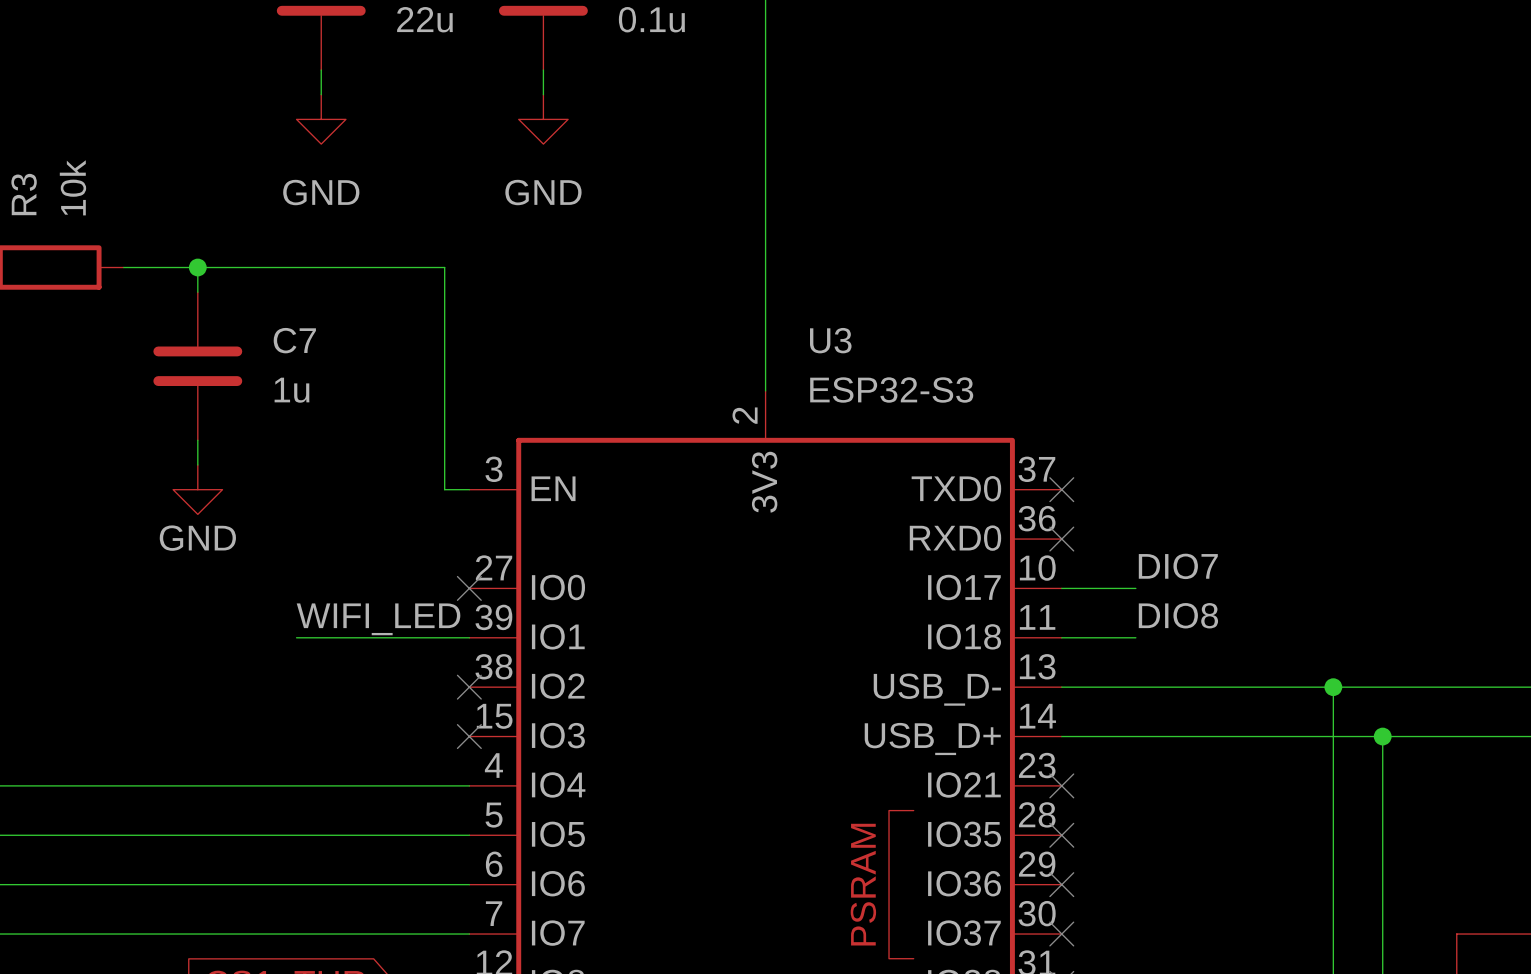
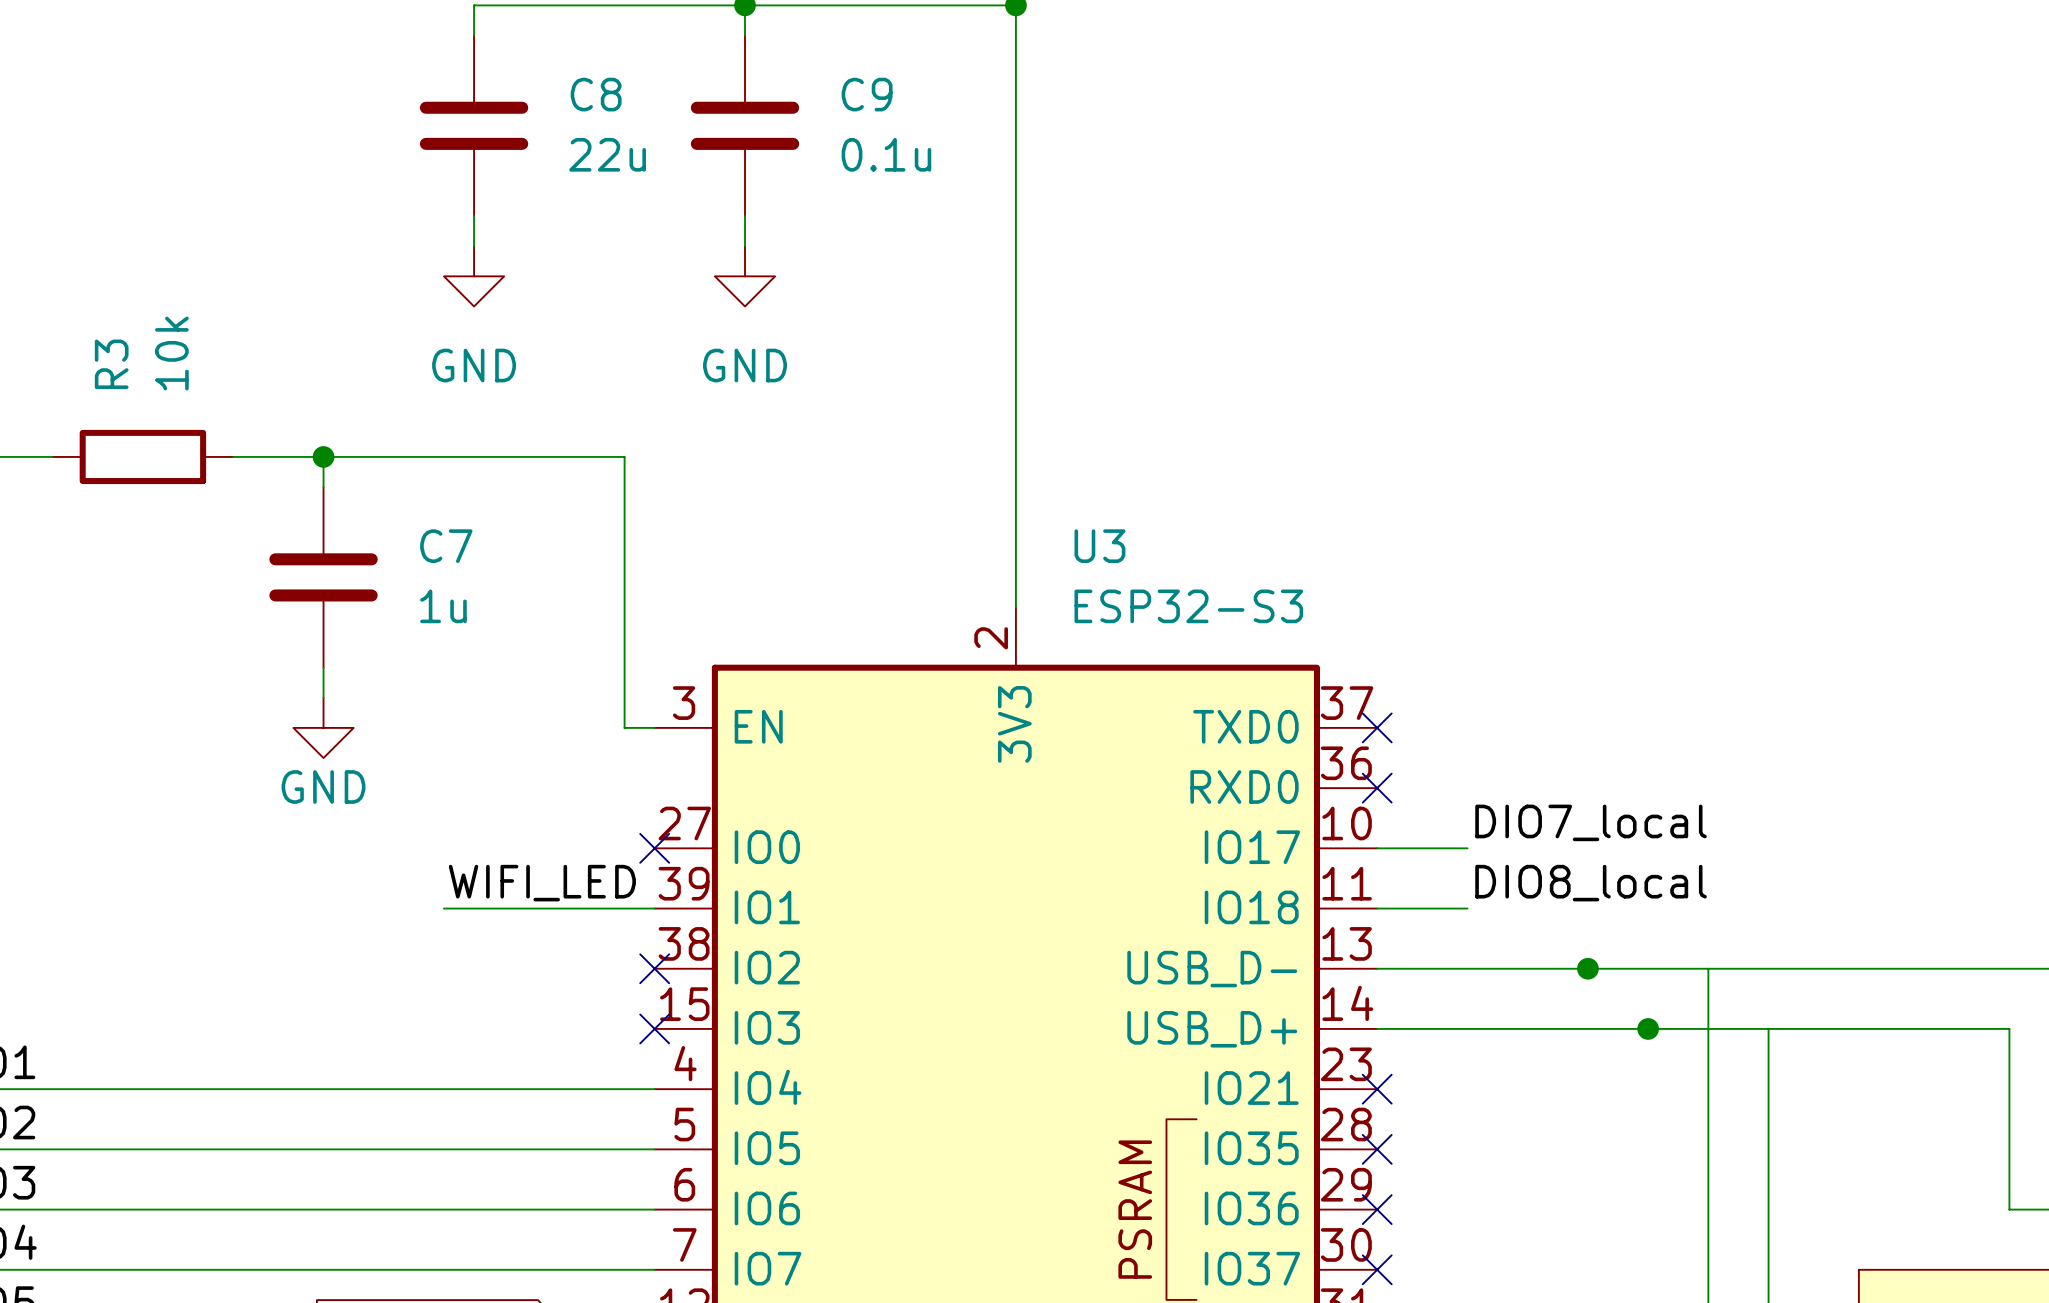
label: DIO7 (1178, 566) -> DIO7_local (1591, 822)
label: DIO8 (1178, 615) -> DIO8_local (1591, 883)
junction: none -> (1587, 968)
junction: (1333, 687) -> none
junction: none -> (1648, 1028)
junction: (1382, 736) -> none

